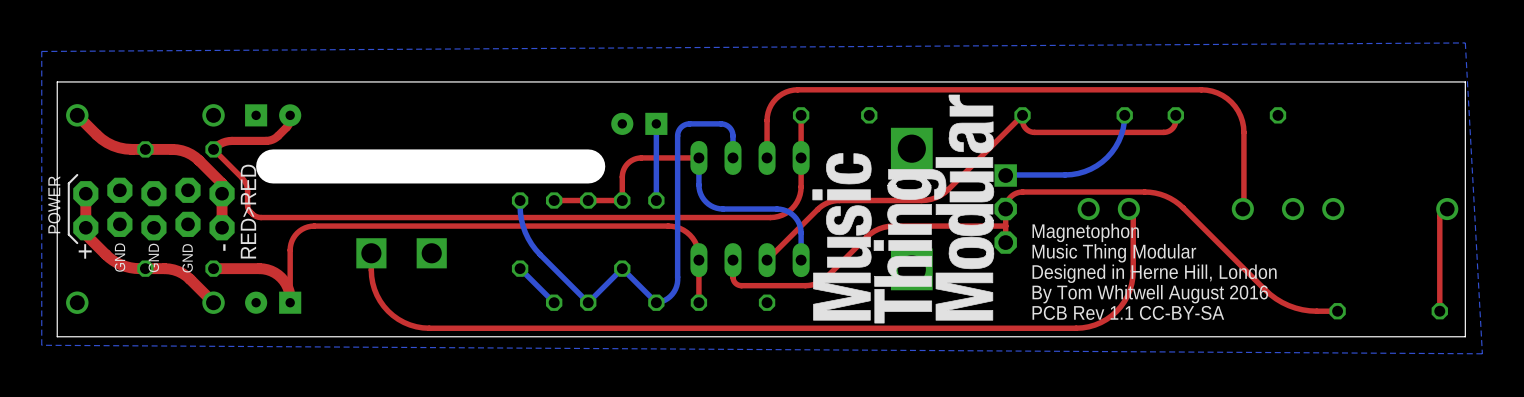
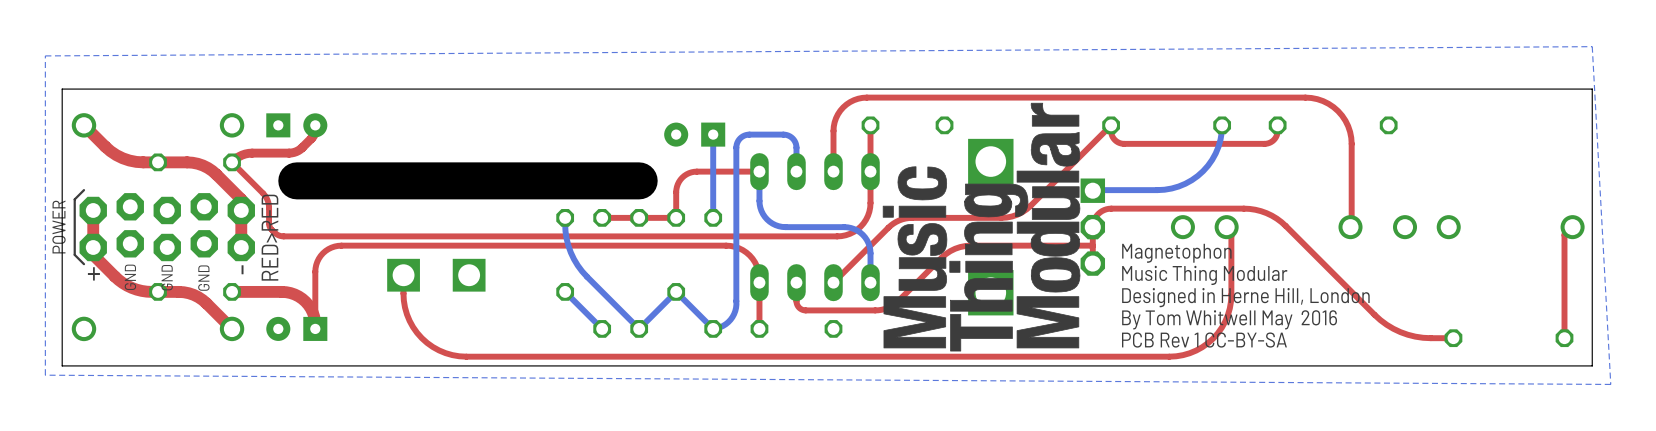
text: By Tom Whitwell August 2016 (1150, 294) -> By Tom Whitwell May 2016 (1229, 319)
text: PCB Rev 1.1 CC-BY-SA (1128, 312) -> PCB Rev 1 CC-BY-SA (1204, 340)

